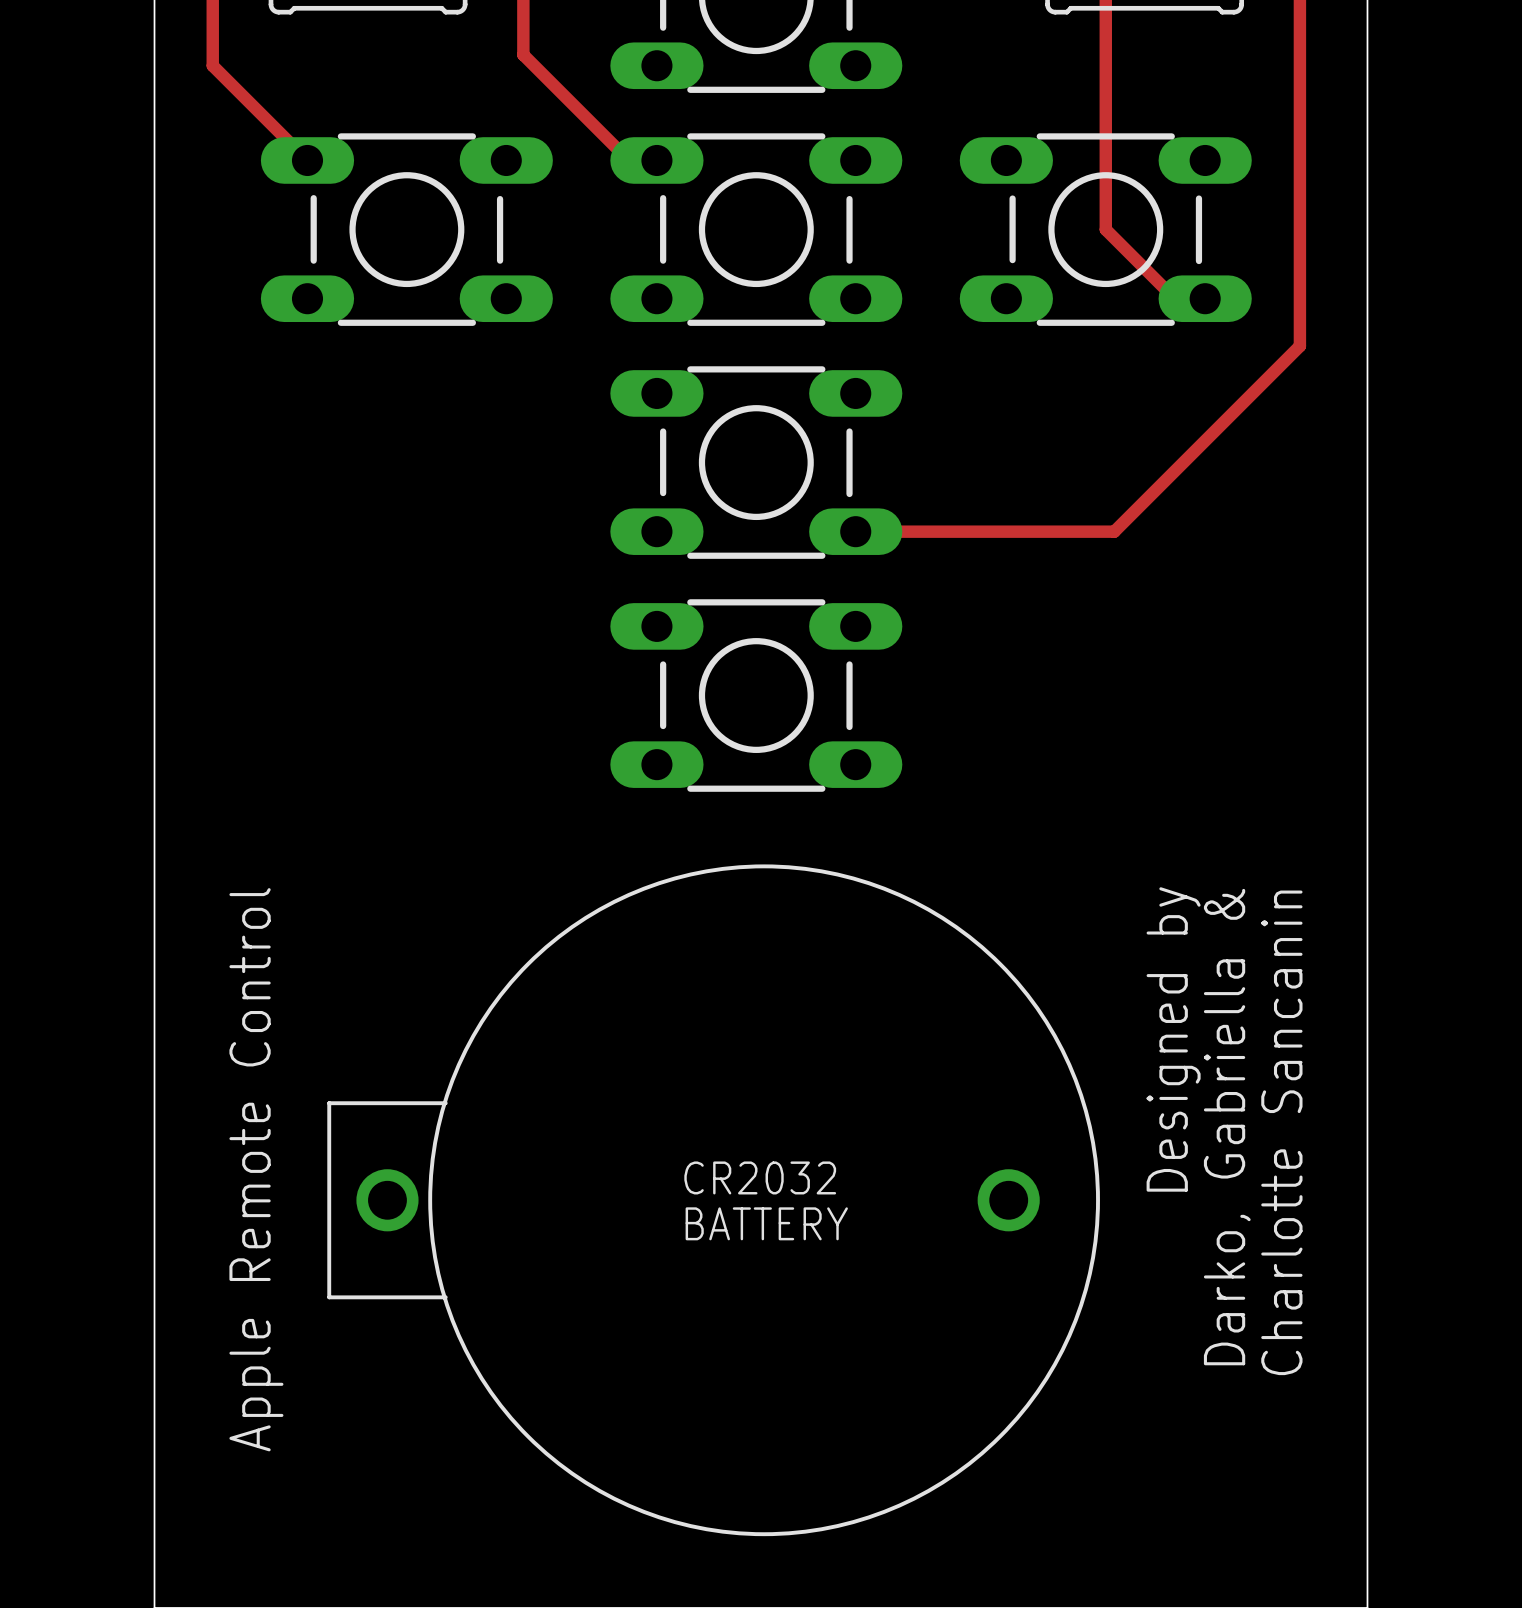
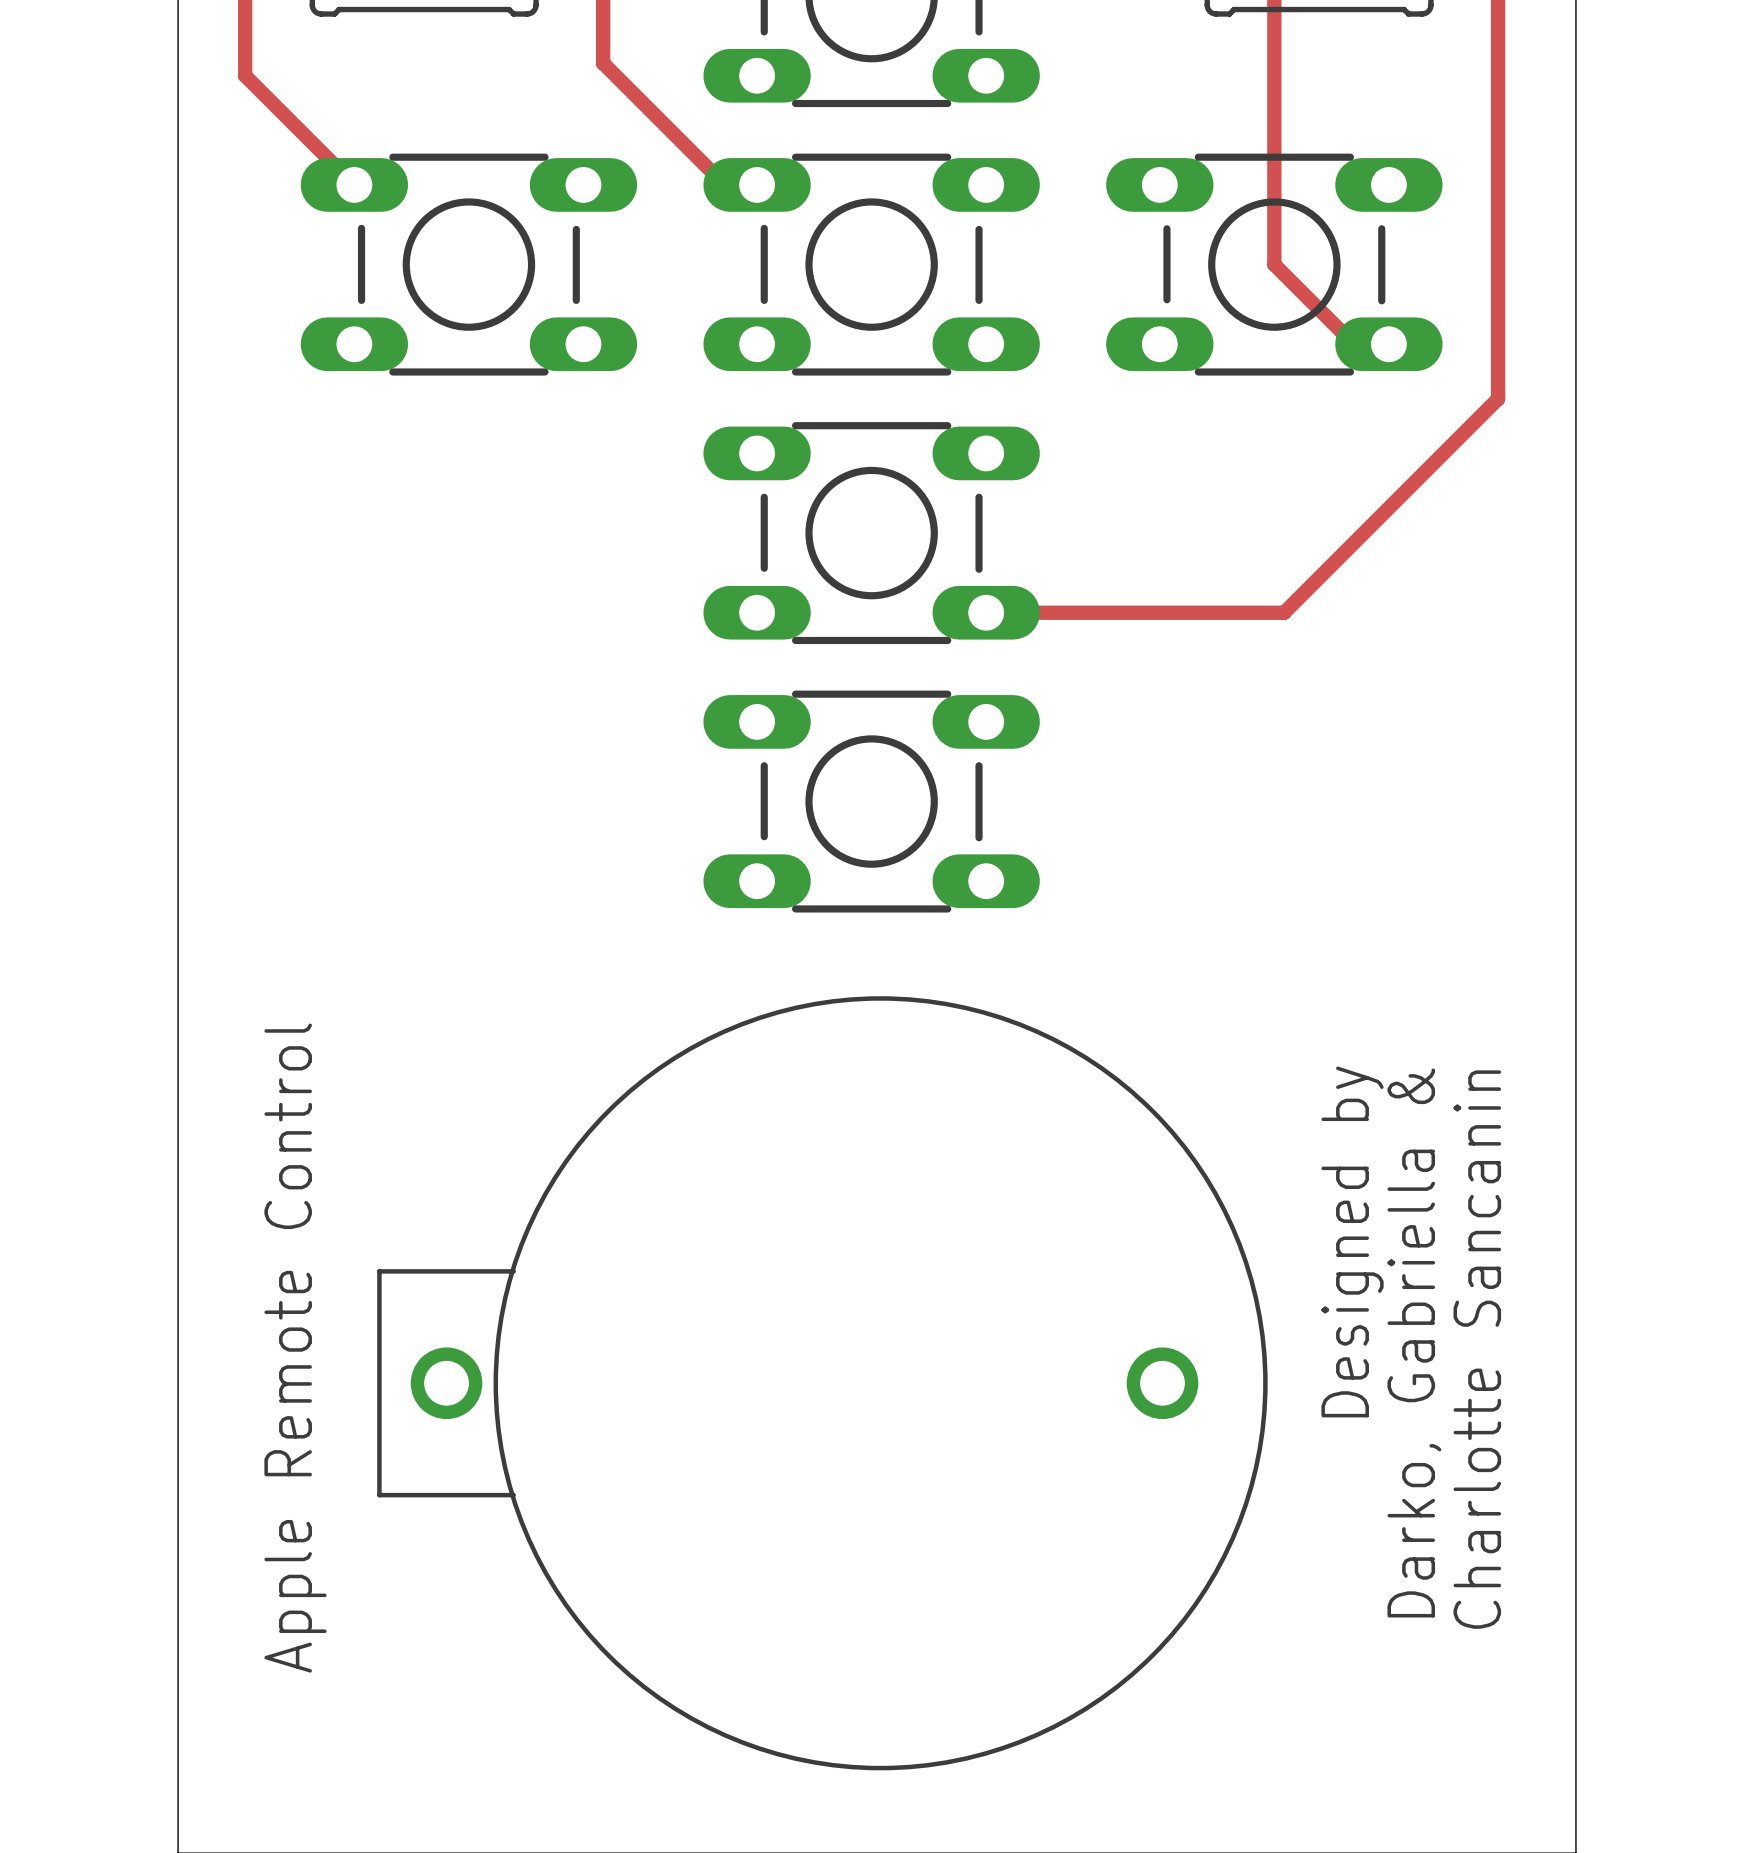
text position: Designed by (1173, 1039) -> Designed by (1352, 1241)
text position: Darko, Gabriella & (1227, 1127) -> Darko, Gabriella & (1414, 1342)
text position: Charlotte Sancanin (1281, 1132) -> Charlotte Sancanin (1477, 1349)
text: CR2032 (760, 1177) -> none
text: BATTERY (766, 1223) -> none

